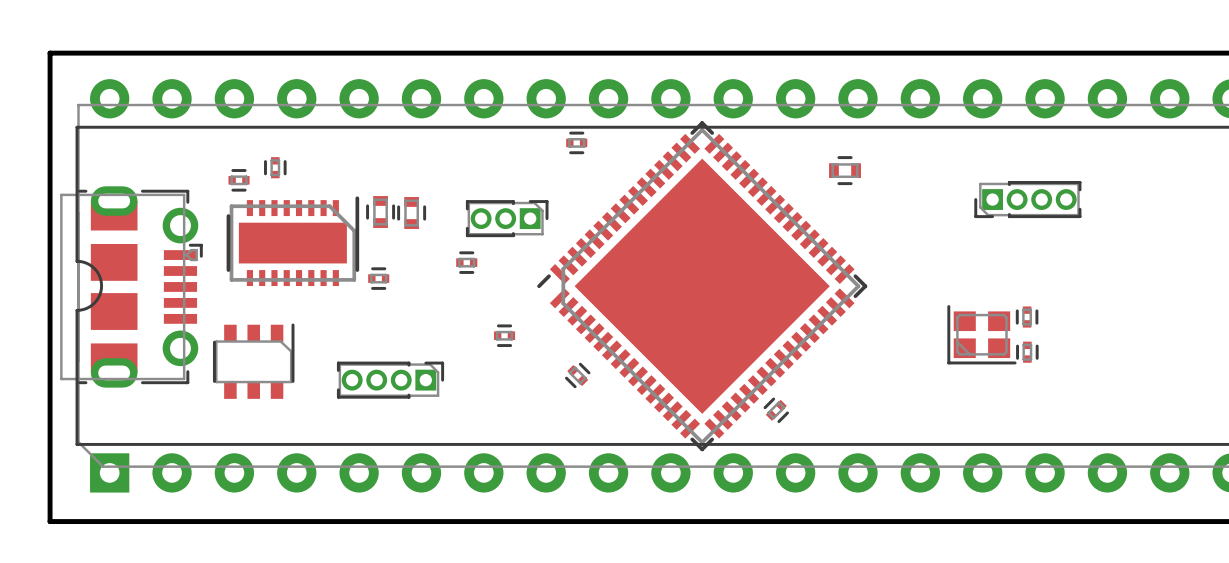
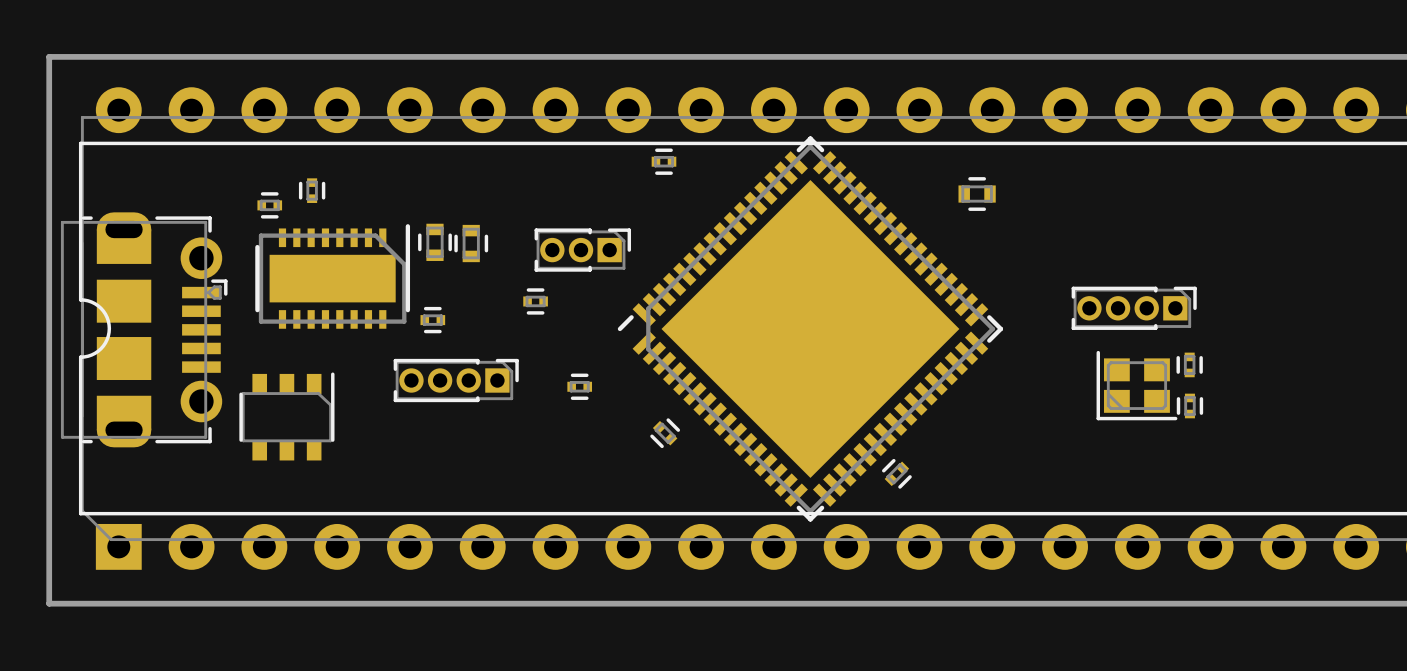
part rotation: 0° (1027, 199) -> 180° (1134, 308)
part position: (1027, 199) -> (1134, 308)
part position: (390, 380) -> (456, 380)

